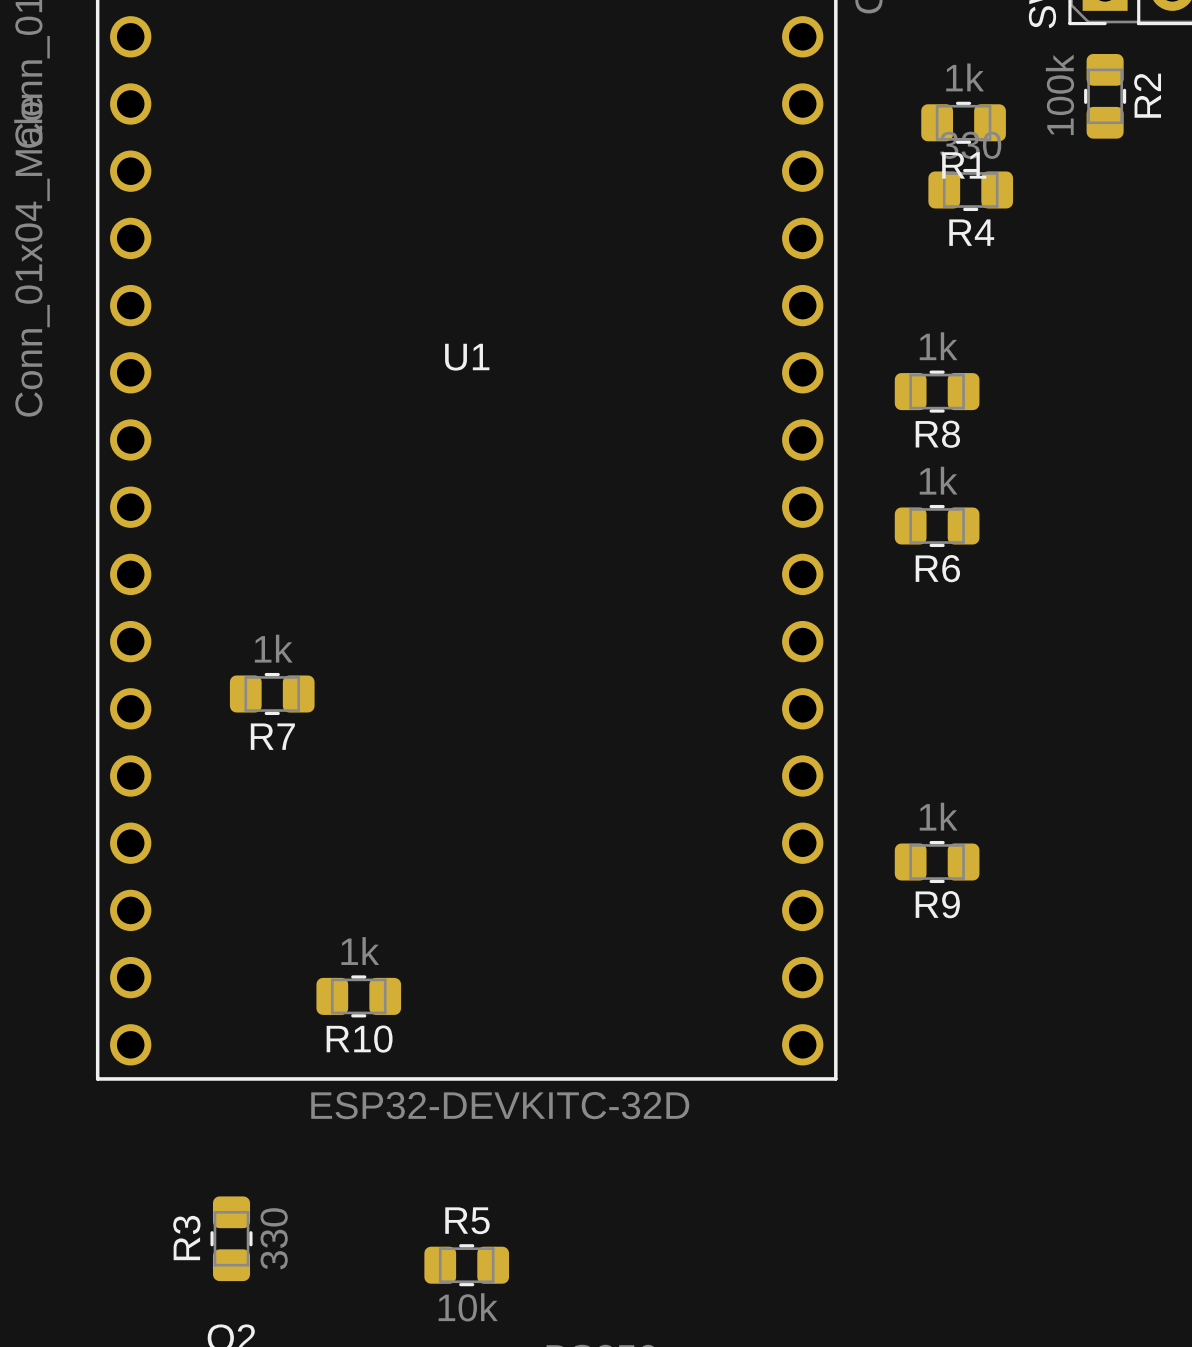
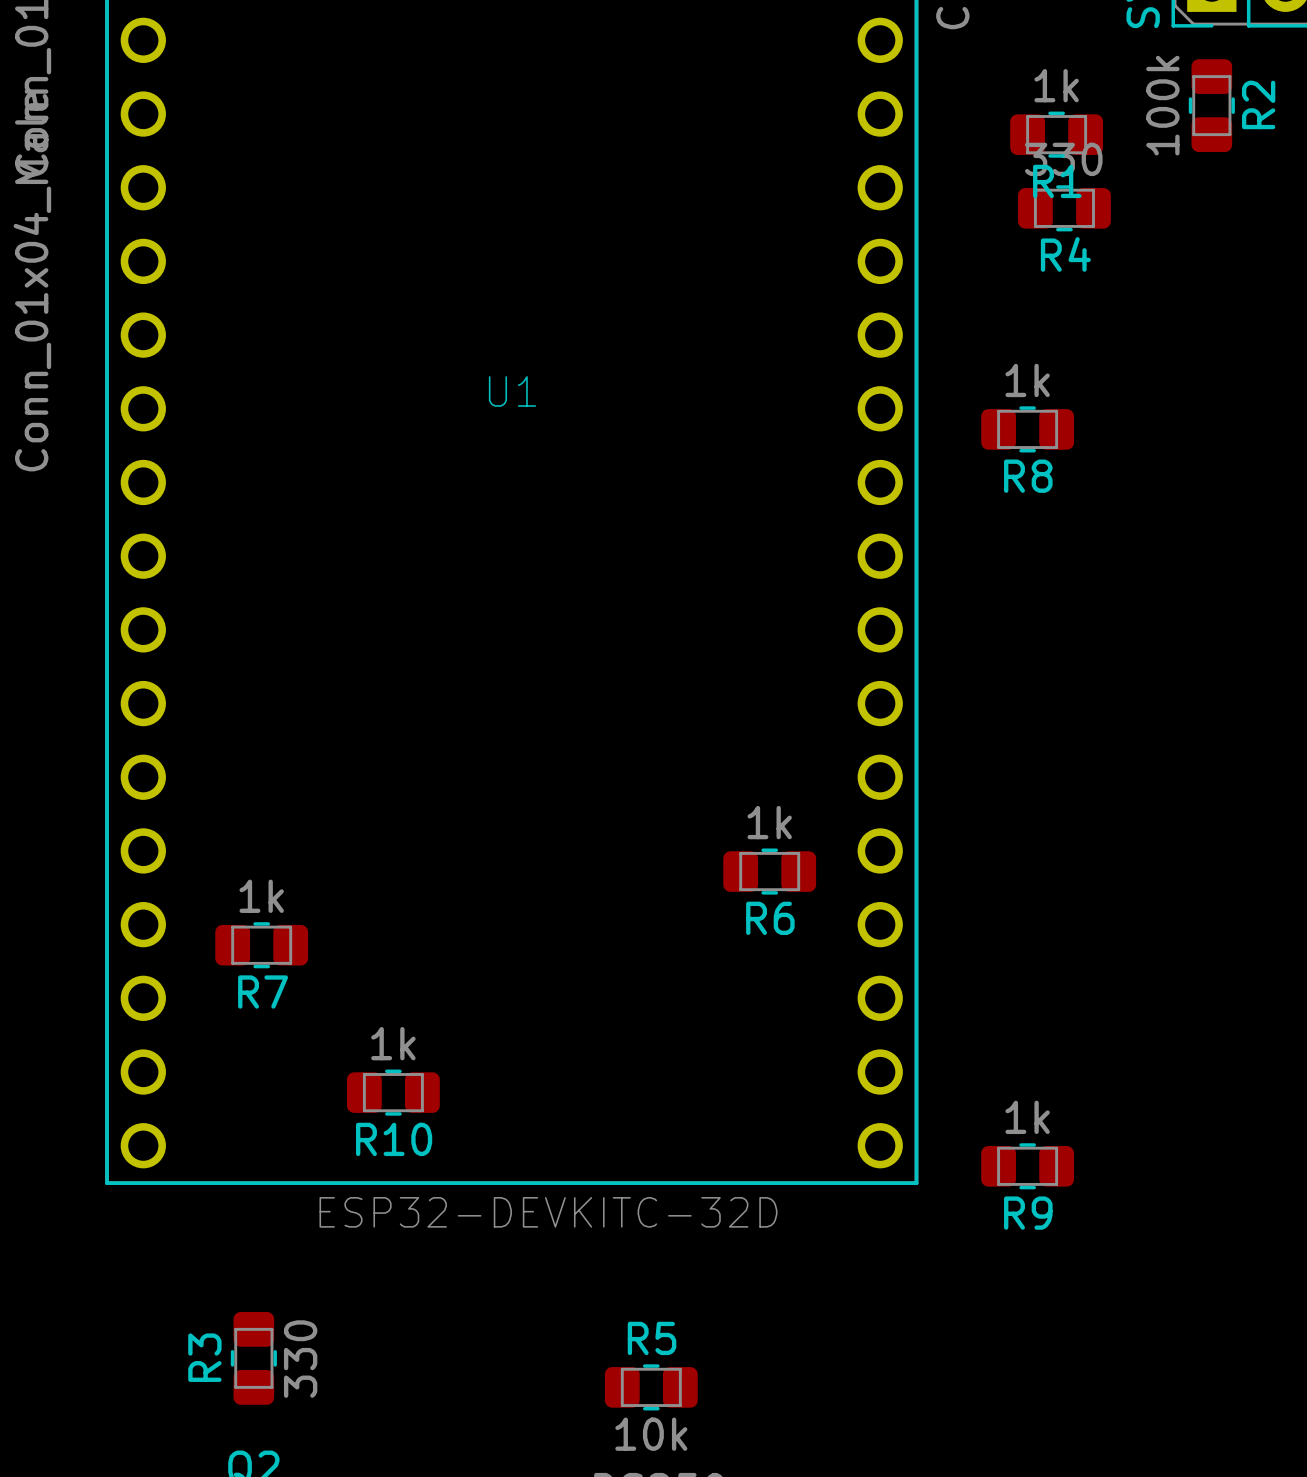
R6 position: (937, 525) -> (769, 871)
R7 position: (272, 693) -> (261, 945)
R9 position: (937, 862) -> (1027, 1166)
R5 position: (466, 1265) -> (651, 1387)

